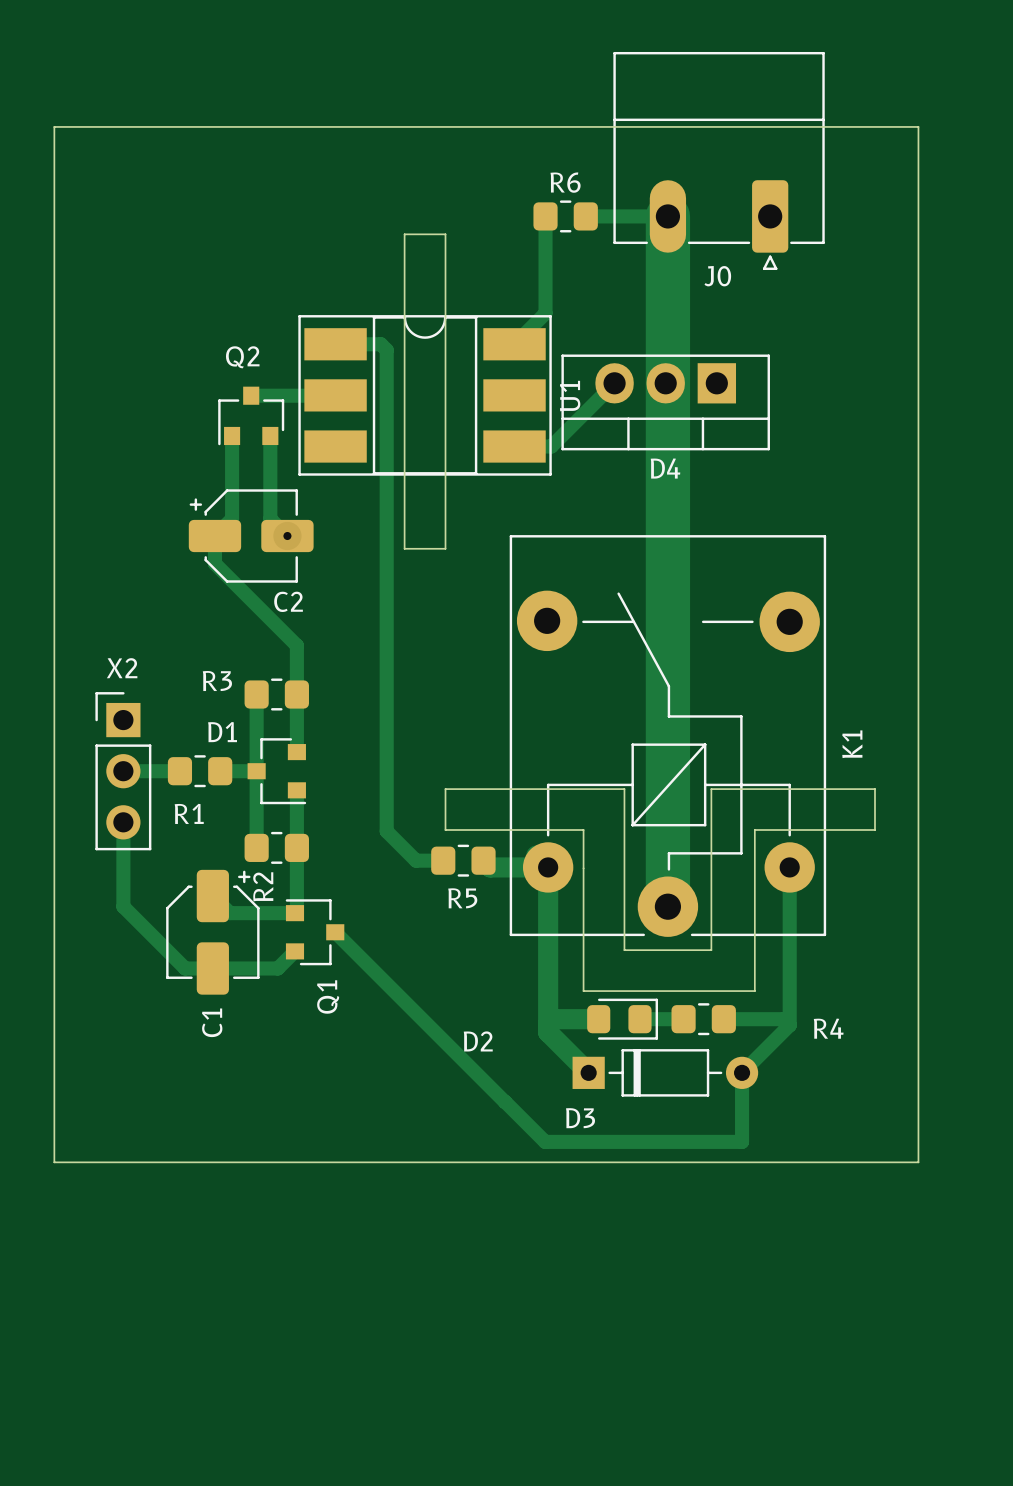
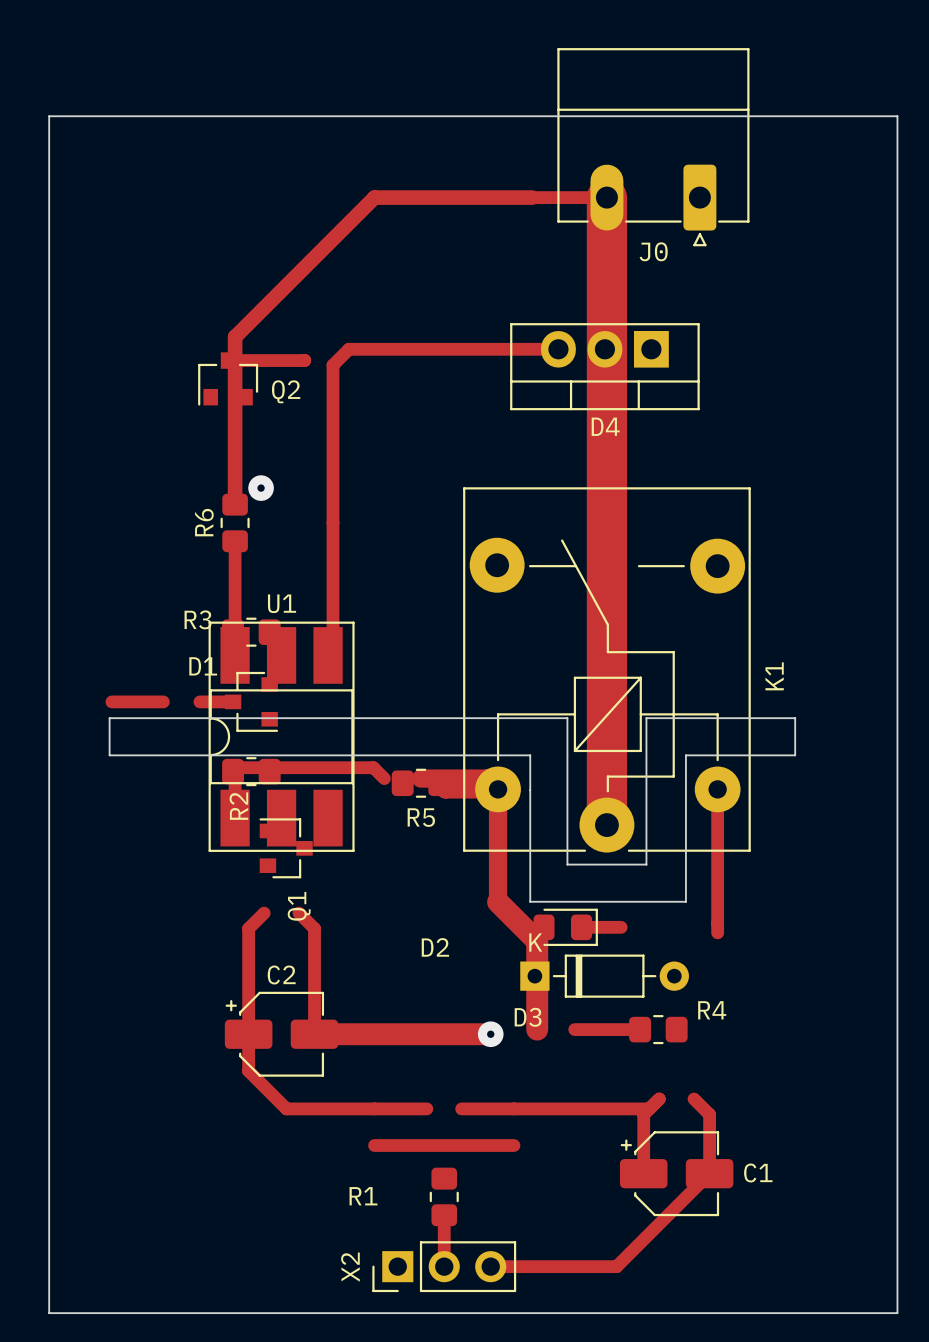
board edge: (918, 126) (918, 1162) (54, 1162) -> (834, 116) (897, 116) (897, 1313) (49, 1313) (49, 1057)
R6 name position: R6 (565, 182) -> R6 (204, 522)
track: (545, 216) (545, 313) (514, 344) -> none
R6 rotation: 0° (565, 216) -> 90° clockwise (235, 522)
R6 position: (565, 216) -> (235, 522)
track: none -> (532, 197) (374, 197) (235, 337) (235, 504)
board edge: (404, 234) (404, 548) (445, 548) (445, 234) (404, 234) -> none
track: (328, 336) (335, 344) (380, 344) (386, 350) (386, 831) (416, 860) (443, 860) -> none
Q2 name position: Q2 (242, 357) -> Q2 (286, 391)
track: (614, 383) (551, 446) (514, 446) -> (558, 349) (348, 349) (333, 365) (333, 650) (328, 655)
U1 rotation: 0° (425, 395) -> 90° counterclockwise (281, 736)
U1 position: (425, 395) -> (281, 736)
track: (232, 435) (232, 518) (214, 536) (214, 563) (296, 645) (296, 752) -> none
track: (270, 435) (270, 518) (287, 536) -> none
C2 position: (251, 536) -> (281, 1034)
track: none -> (235, 541) (235, 655)
C2 name position: C2 (288, 601) -> C2 (281, 975)
track: (256, 694) (256, 847) -> none
X2 rotation: 0° (123, 771) -> 90° counterclockwise (444, 1266)
X2 position: (123, 771) -> (444, 1266)
R1 rotation: 0° (200, 771) -> 90° clockwise (444, 1196)
R1 position: (200, 771) -> (444, 1196)
board edge: (445, 789) (445, 830) -> (404, 718) (109, 718) (109, 755) (404, 755)
track: (296, 790) (296, 911) (294, 913) (229, 913) (212, 896) -> none
R1 name position: R1 (189, 813) -> R1 (363, 1196)
track: (123, 822) (123, 906) (185, 968) (277, 968) (294, 951) -> none
track: none -> (384, 778) (373, 767) (235, 767) (235, 818)
track: none -> (421, 778) (487, 778)
C1 rotation: 0° (212, 932) -> 90° counterclockwise (676, 1173)
C1 position: (212, 932) -> (676, 1173)
track: (335, 932) (505, 1102) -> none
track: (548, 991) (548, 1032) (588, 1072) -> (498, 902) (537, 941) (537, 1029)
track: none -> (264, 913) (248, 928) (248, 1071) (286, 1108) (426, 1108)
track: none -> (298, 913) (314, 928) (314, 1034) (490, 1034)
track: (598, 1019) (552, 1019) (548, 1023) -> none
R4 position: (703, 1019) -> (658, 1029)
track: (723, 1019) (783, 1019) (789, 1025) (742, 1072) (742, 1141) (545, 1141) (505, 1102) -> none
R4 name position: R4 (828, 1028) -> R4 (712, 1010)
D3 text: none -> K (535, 942)
track: none -> (574, 1029) (640, 1029)
via: none -> (490, 1034)
track: none -> (659, 1099) (643, 1114) (643, 1173)
track: none -> (694, 1099) (709, 1114) (709, 1173) (616, 1266) (490, 1266)
track: none -> (461, 1108) (649, 1108)
track: none -> (374, 1145) (513, 1145)
track: none -> (444, 1215) (444, 1266)

